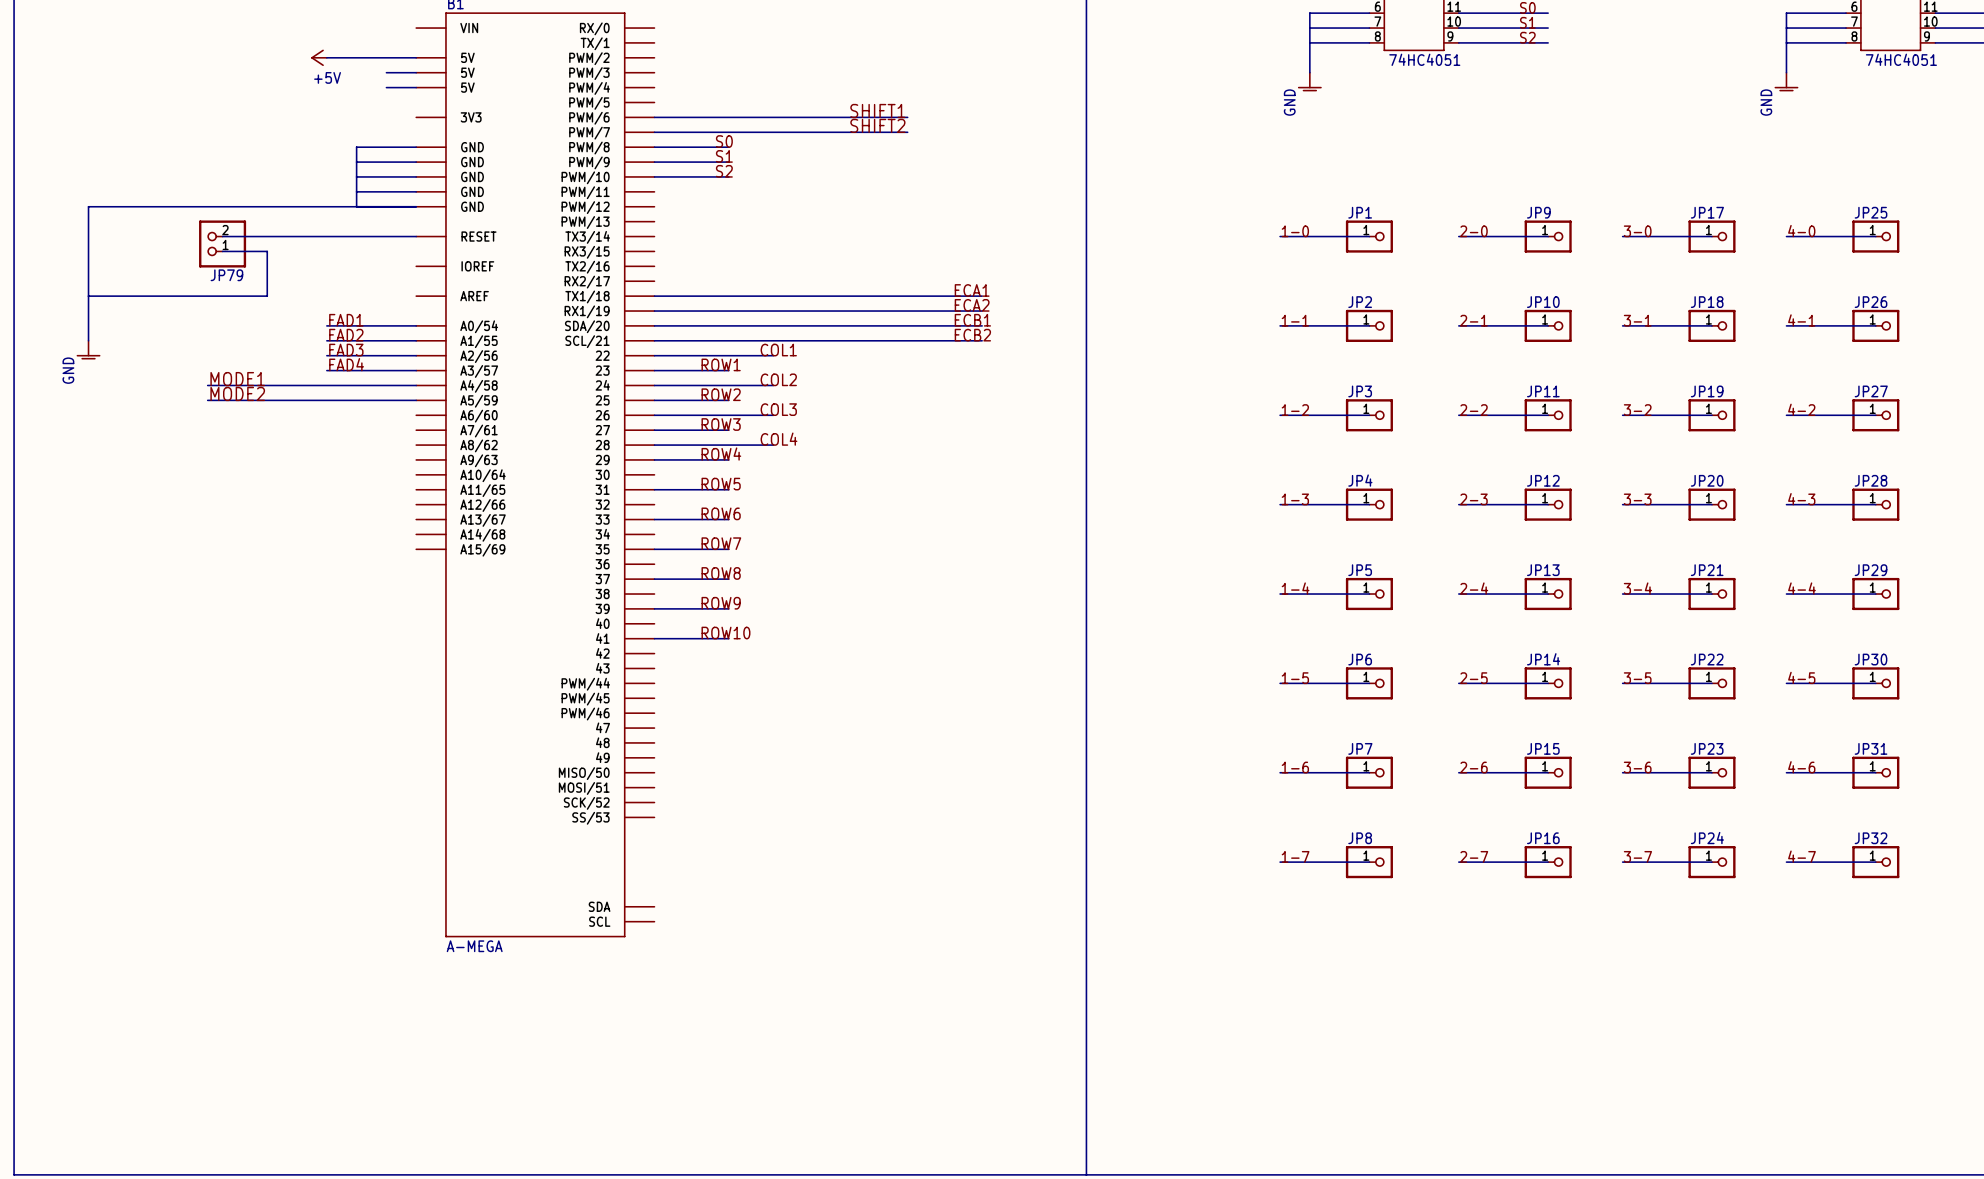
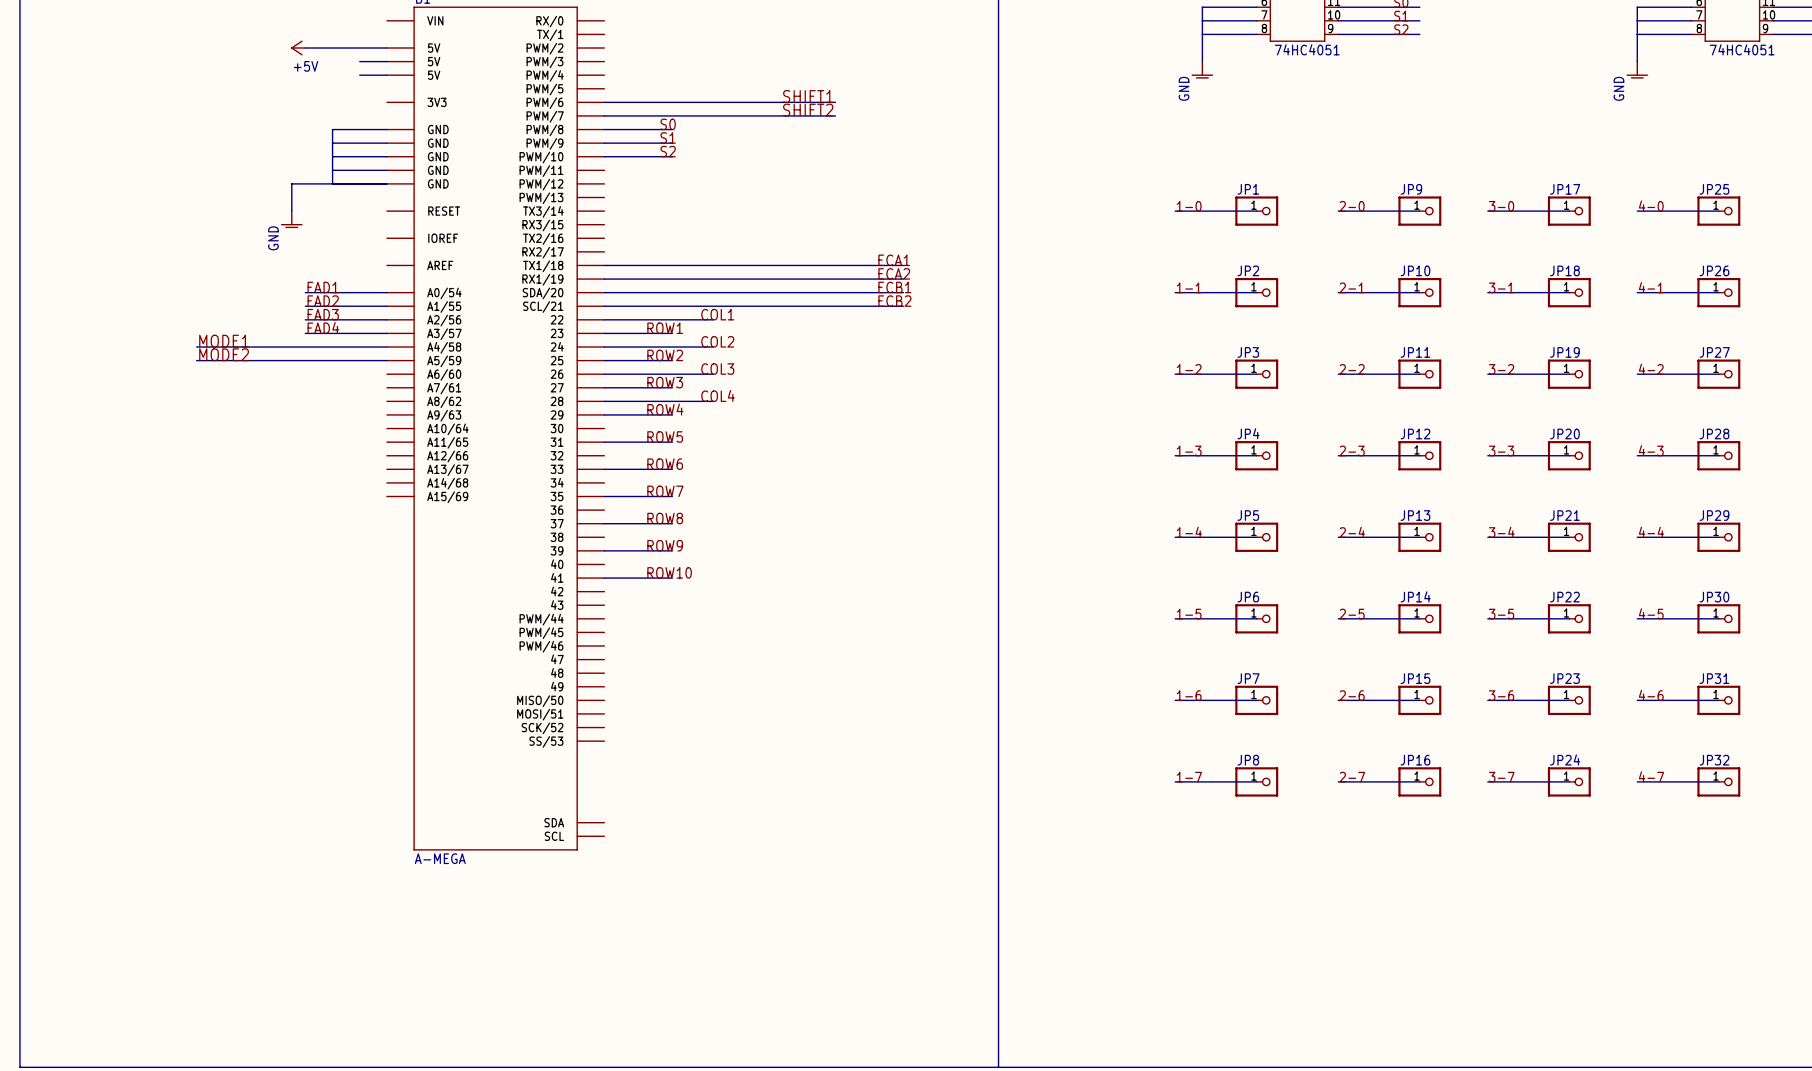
wire: (311, 206) (88, 206) (88, 340) -> (291, 183) (291, 211)
wire: (222, 236) (416, 236) -> none
JP79: (222, 243) -> none
power symbol: none -> GND (291, 219)
wire: (222, 251) (267, 251) (267, 296) (88, 296) -> none
power symbol: GND (88, 350) -> none

